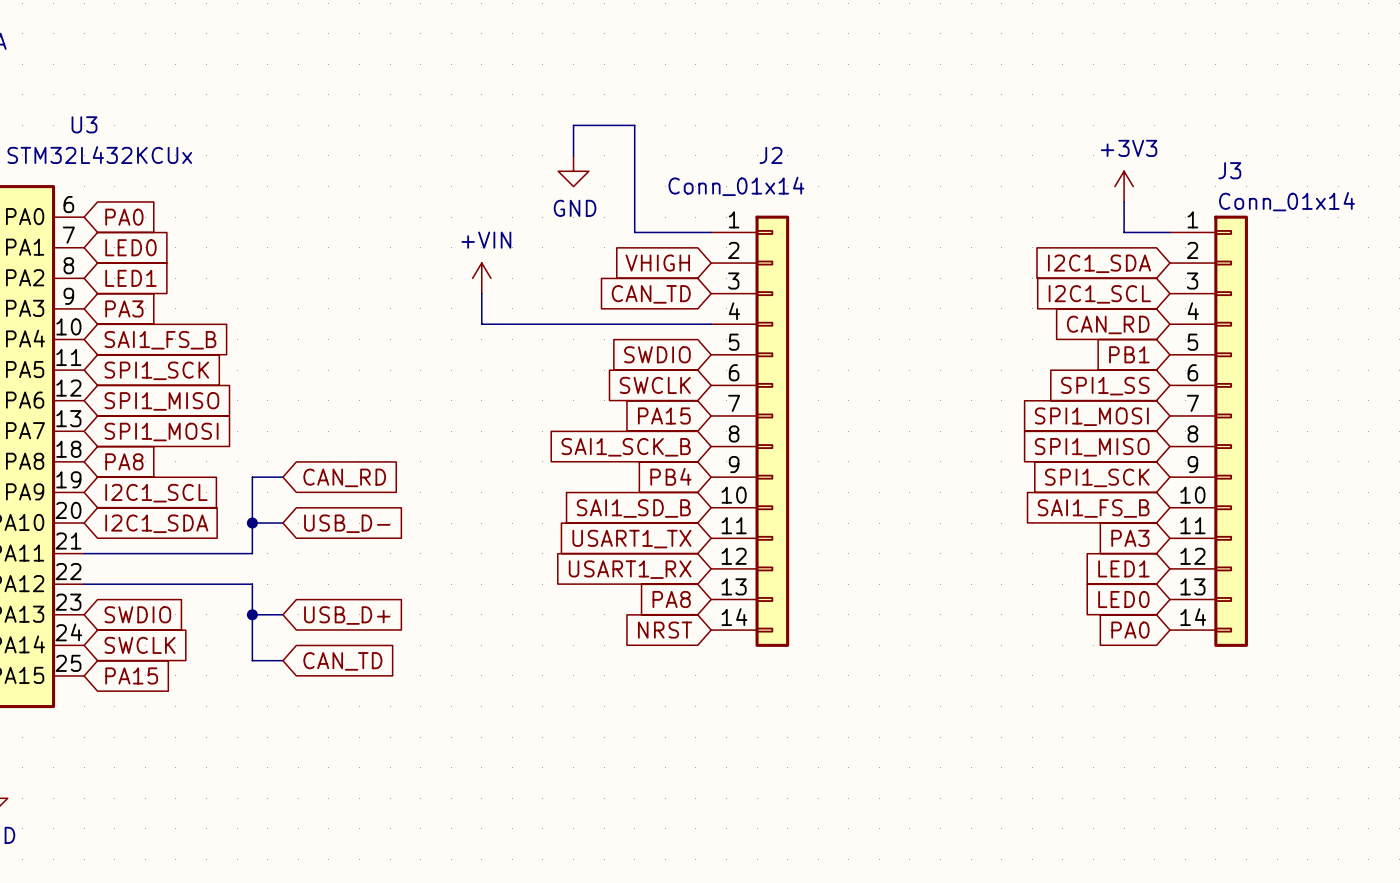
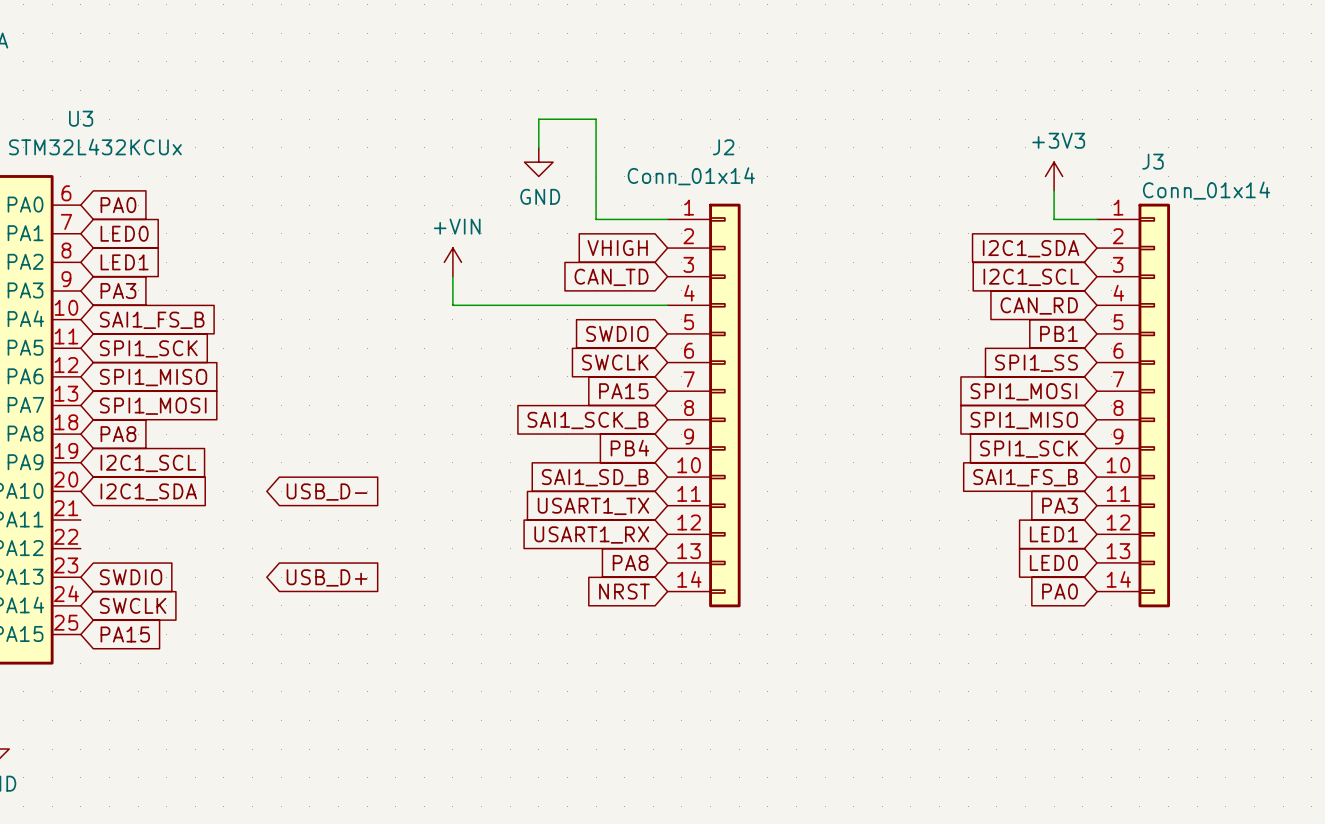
wire: (282, 477) (252, 477) (252, 553) (84, 553) -> none
global label: CAN_RD (344, 477) -> none
wire: (252, 523) (282, 523) -> none
junction: (252, 523) -> none
wire: (84, 584) (252, 584) (252, 660) (282, 660) -> none
wire: (252, 614) (282, 614) -> none
junction: (252, 614) -> none
global label: CAN_TD (342, 661) -> none

